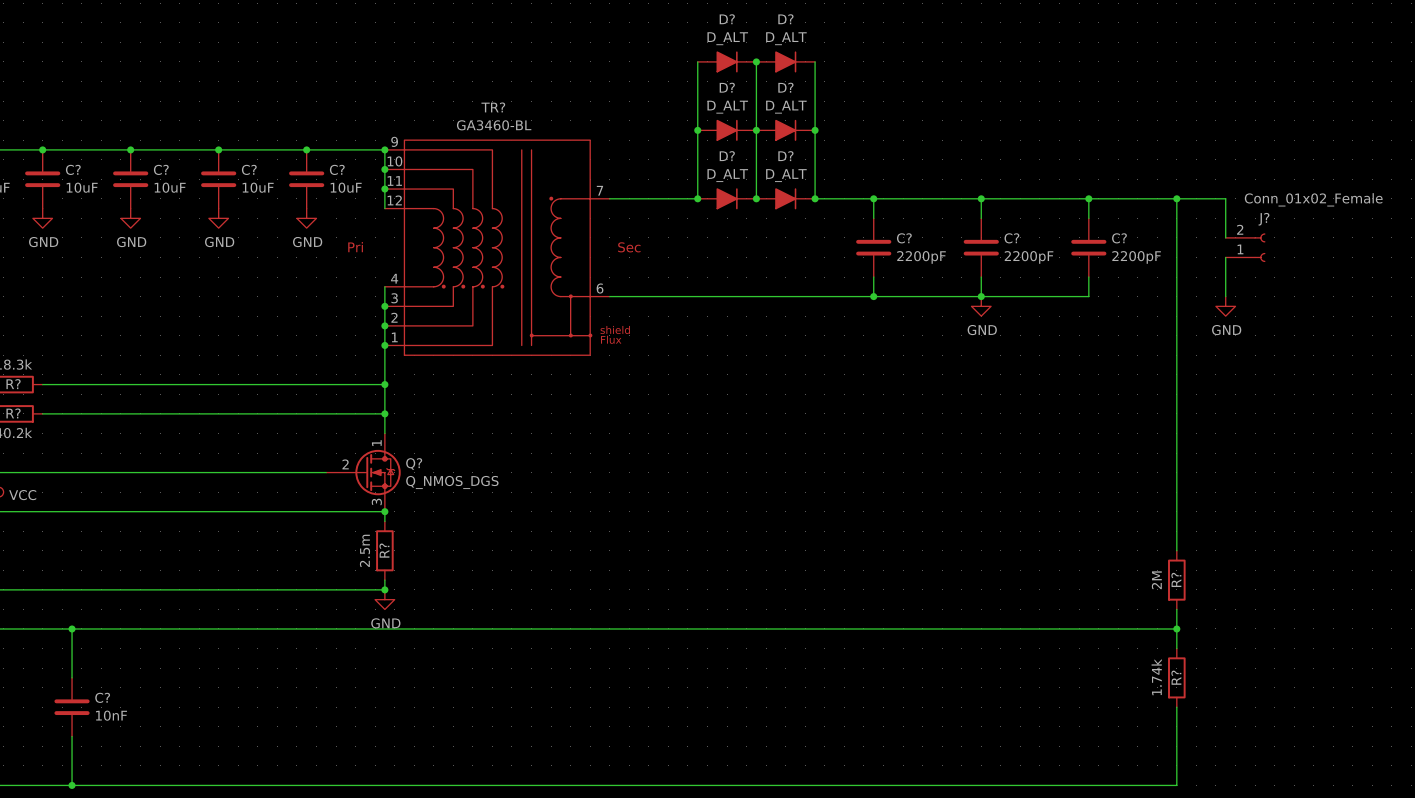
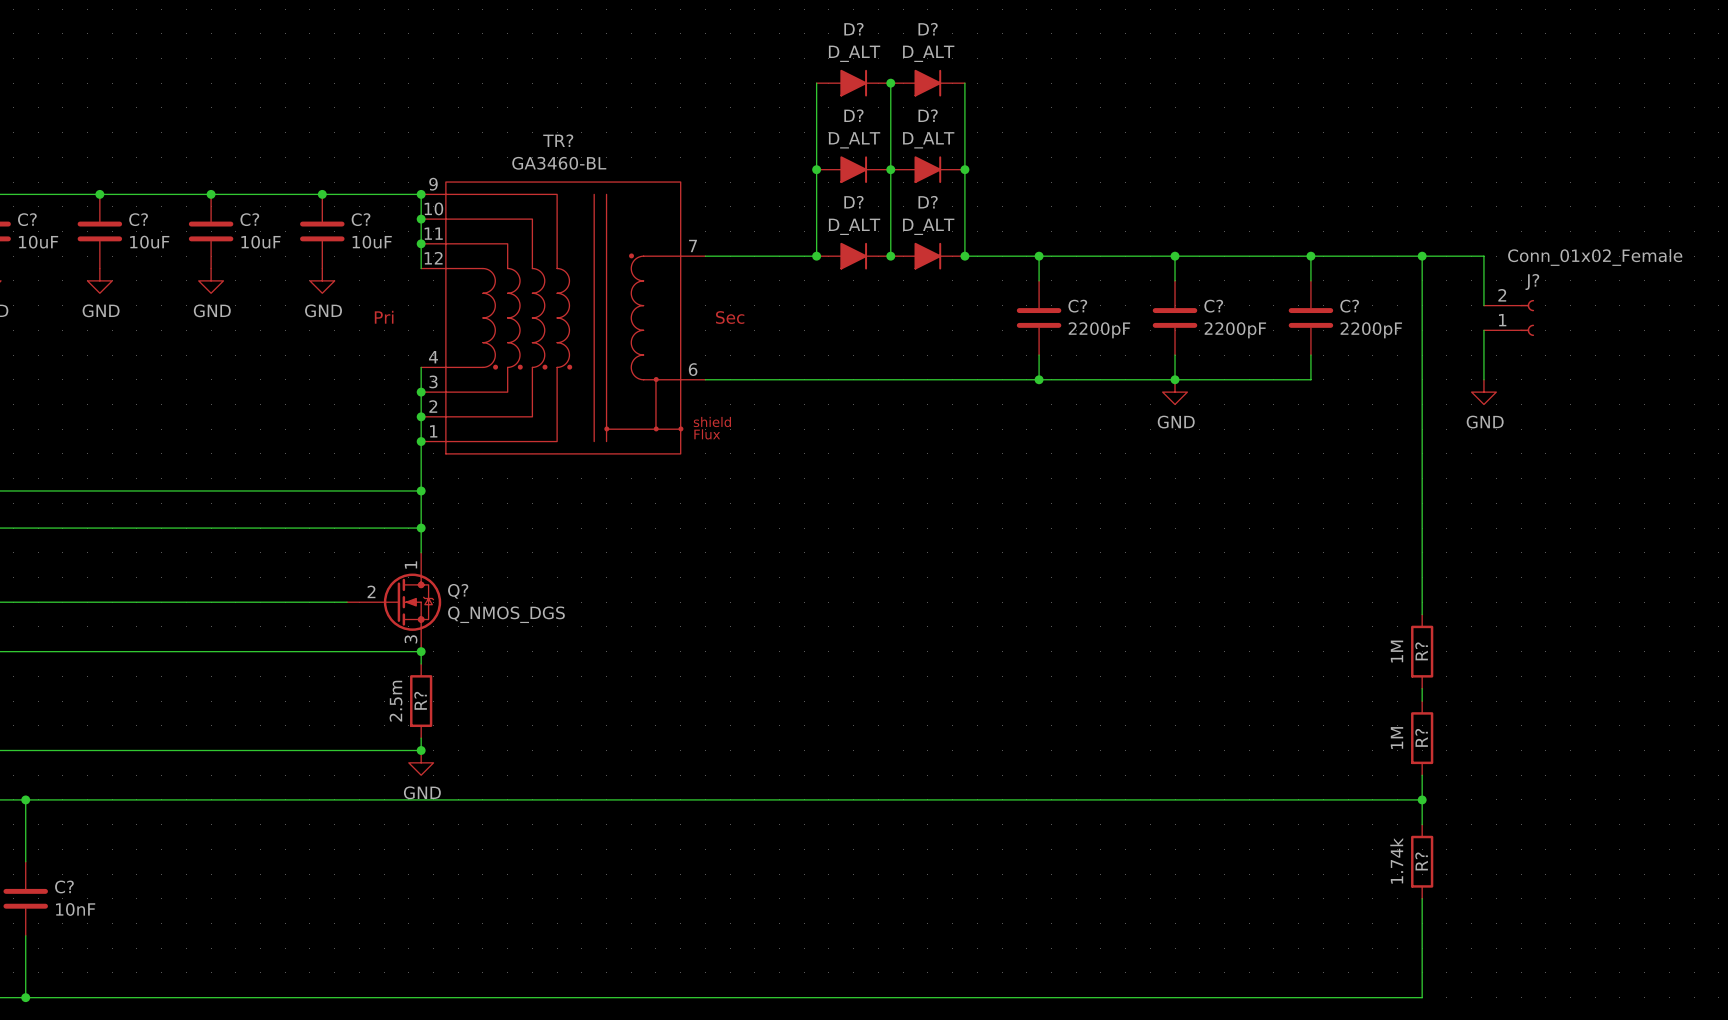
wire: (1176, 482) (1176, 541) -> none
R?: none -> 1M (1422, 651)
R? value: 2M (1156, 580) -> 1M (1396, 738)

